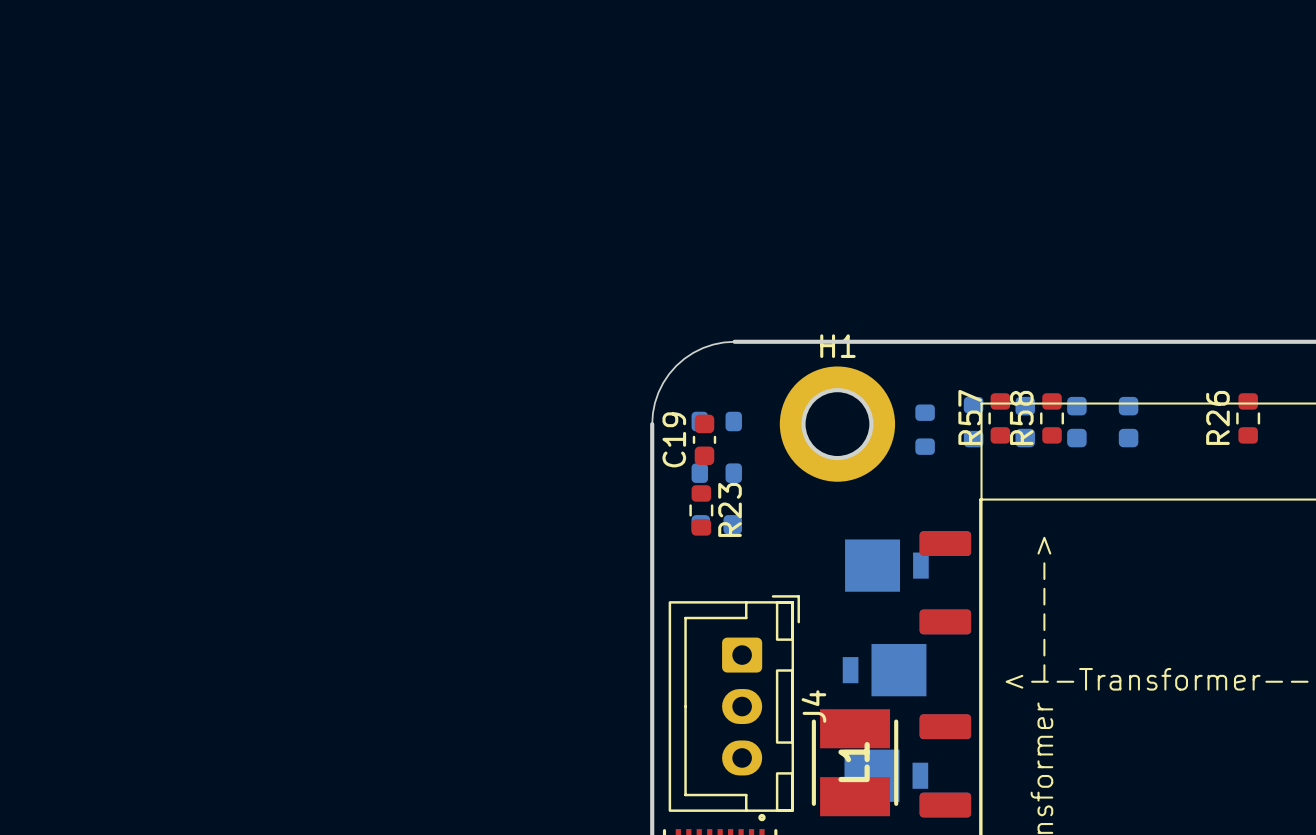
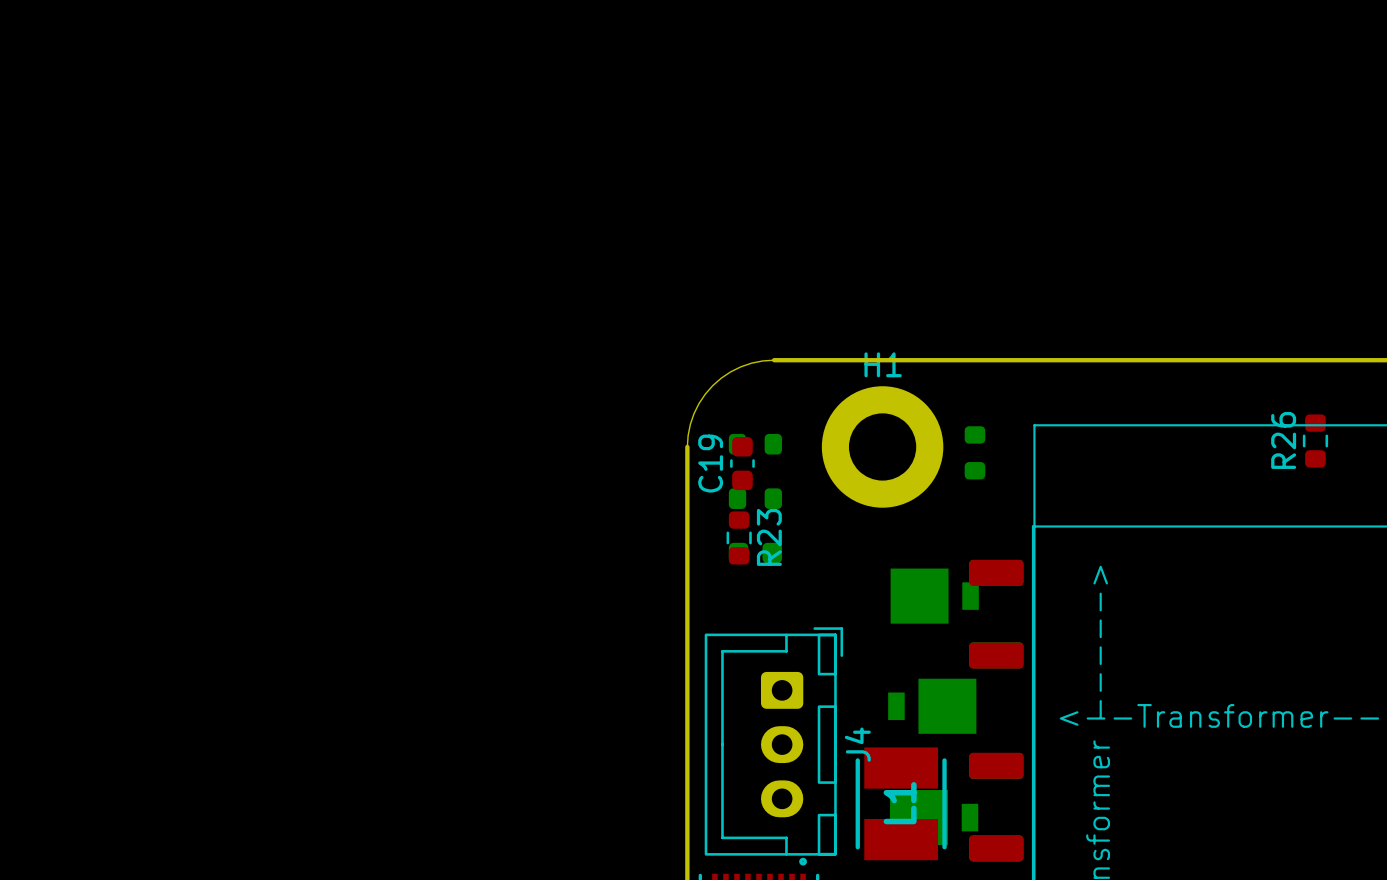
R57: (1000, 418) -> none
R58: (1052, 418) -> none
part: (973, 422) -> none
part: (1025, 422) -> none
part: (1076, 422) -> none
part: (1128, 422) -> none

